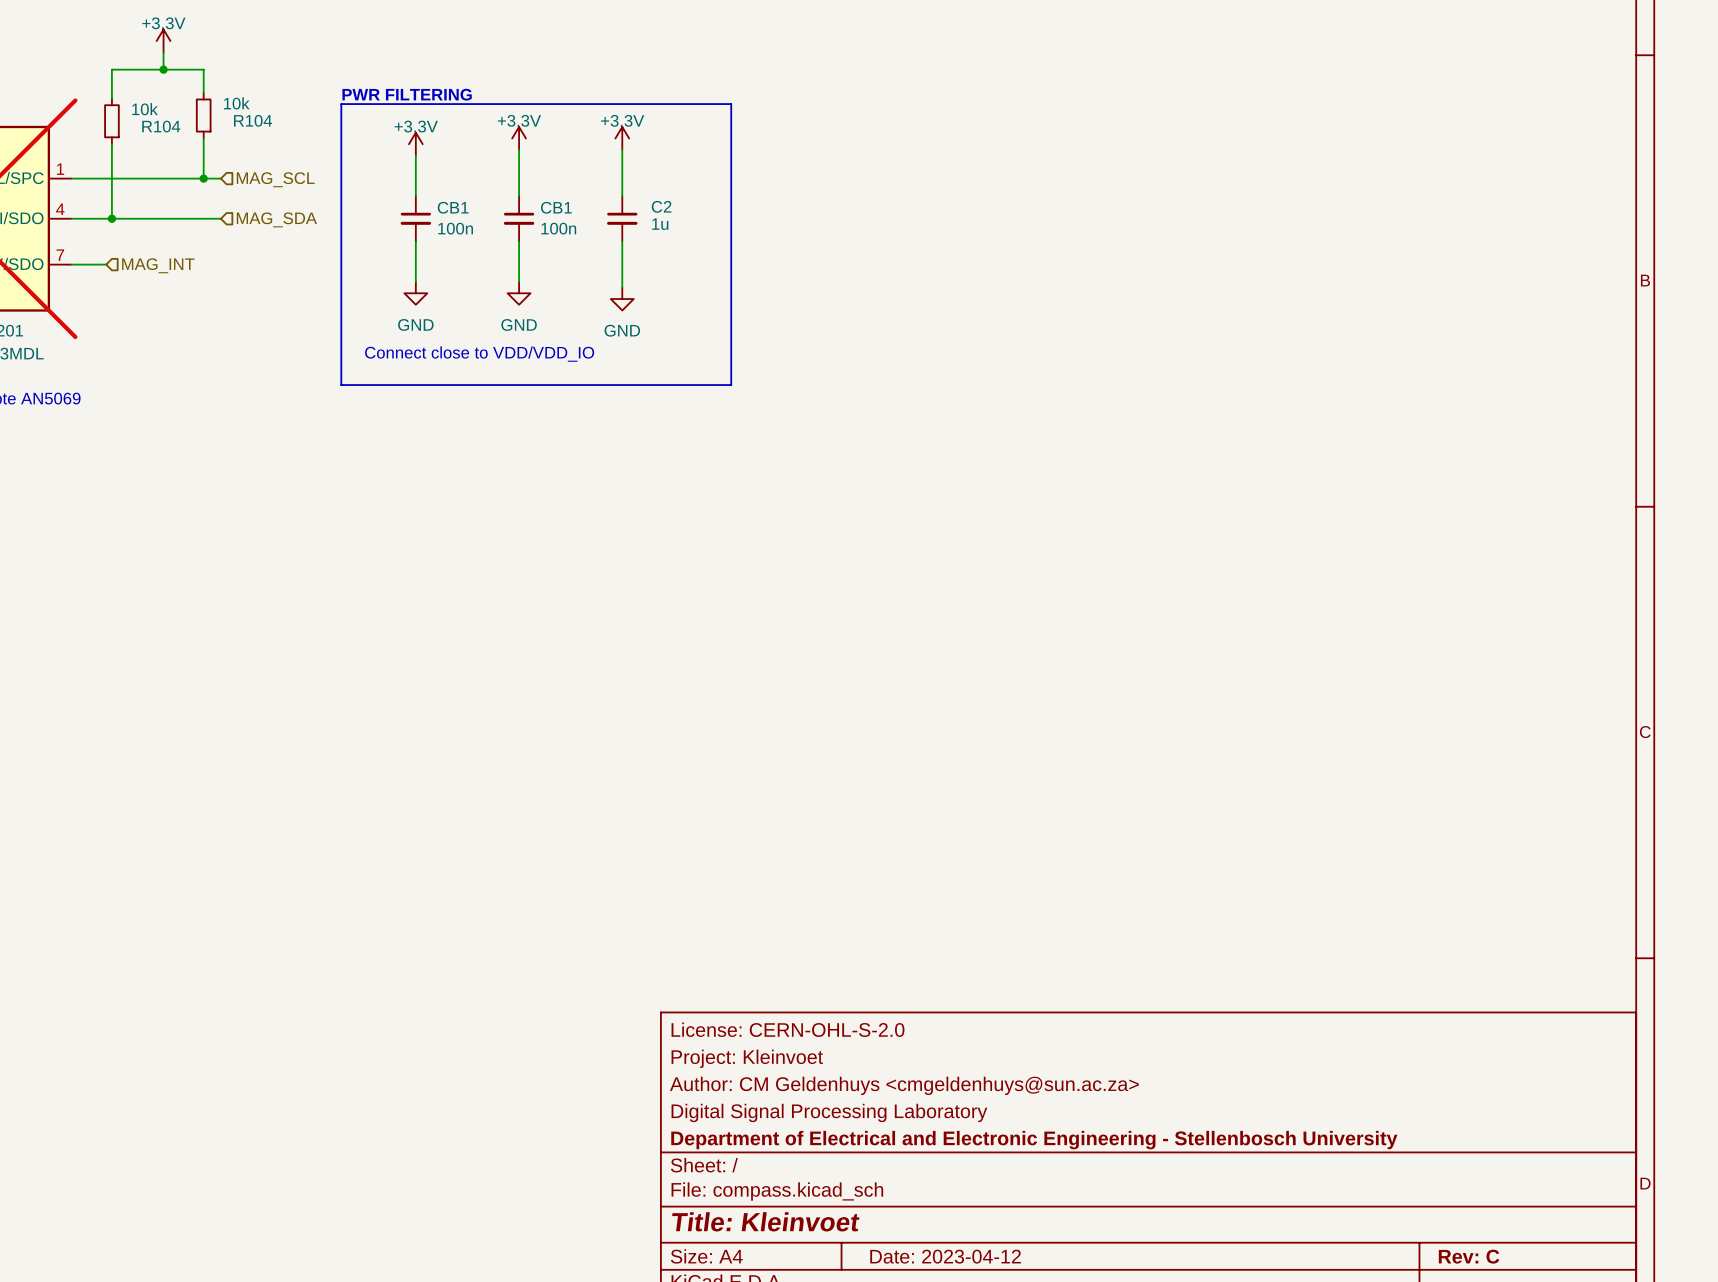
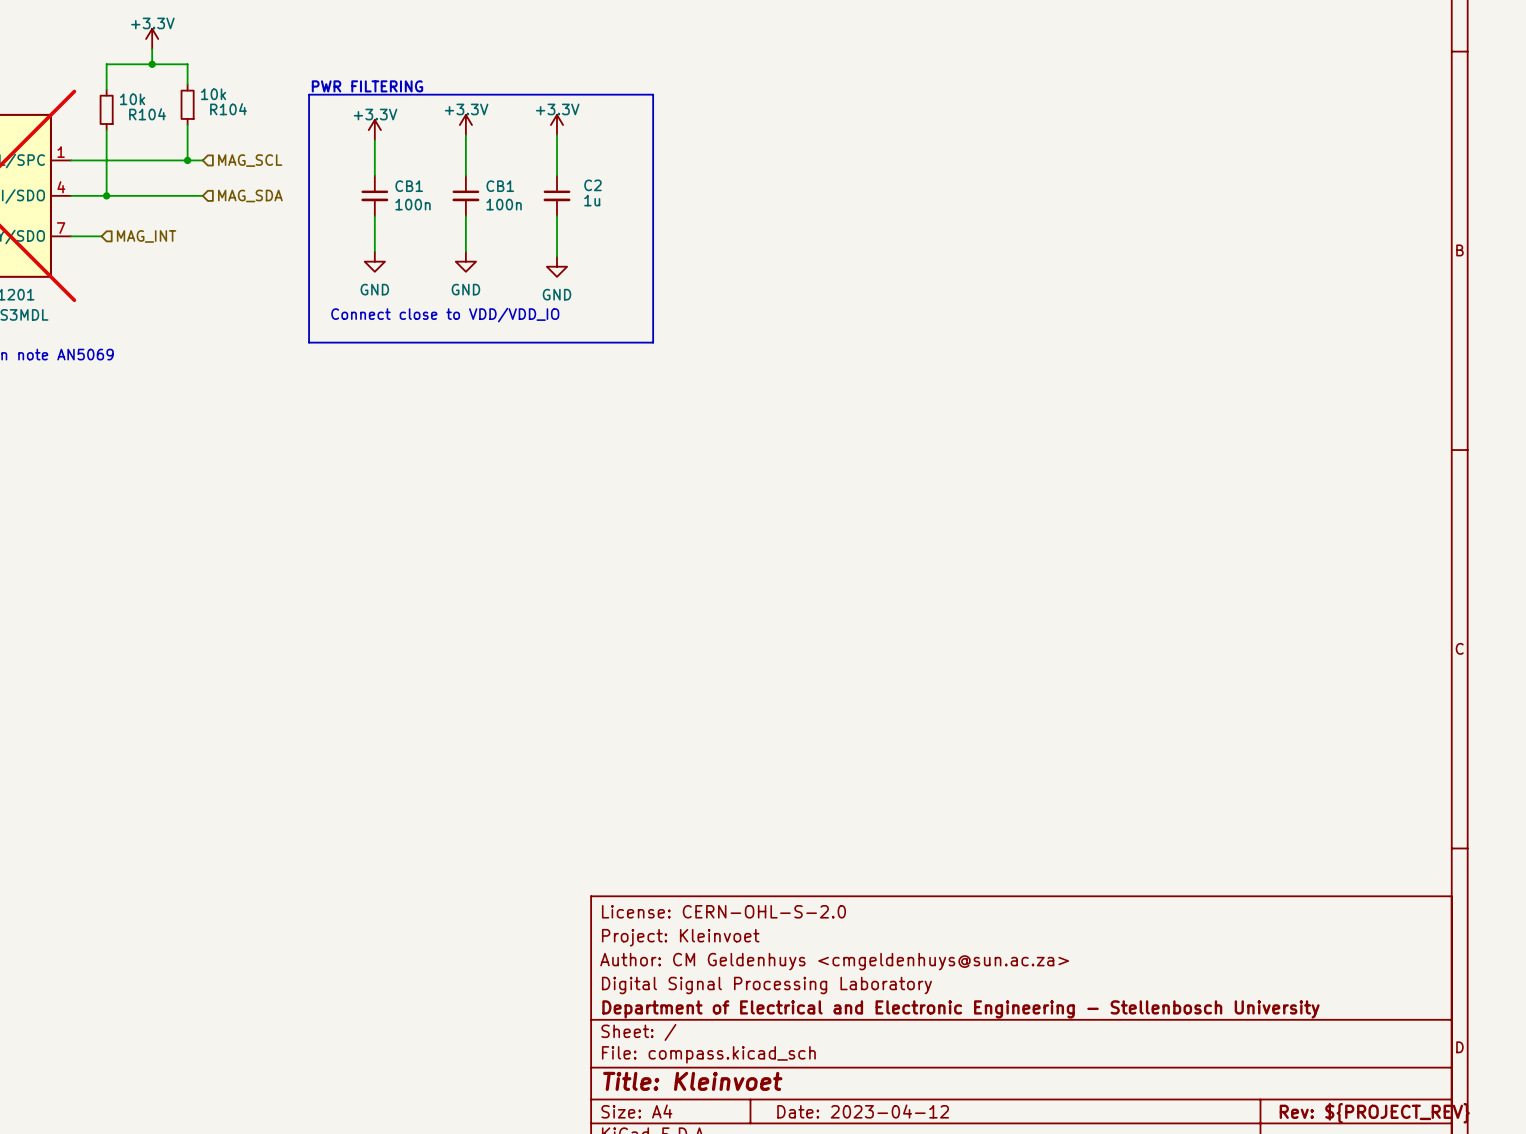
title block: Rev: C (1469, 1256) -> Rev: ${PROJECT_REV} (1374, 1113)

